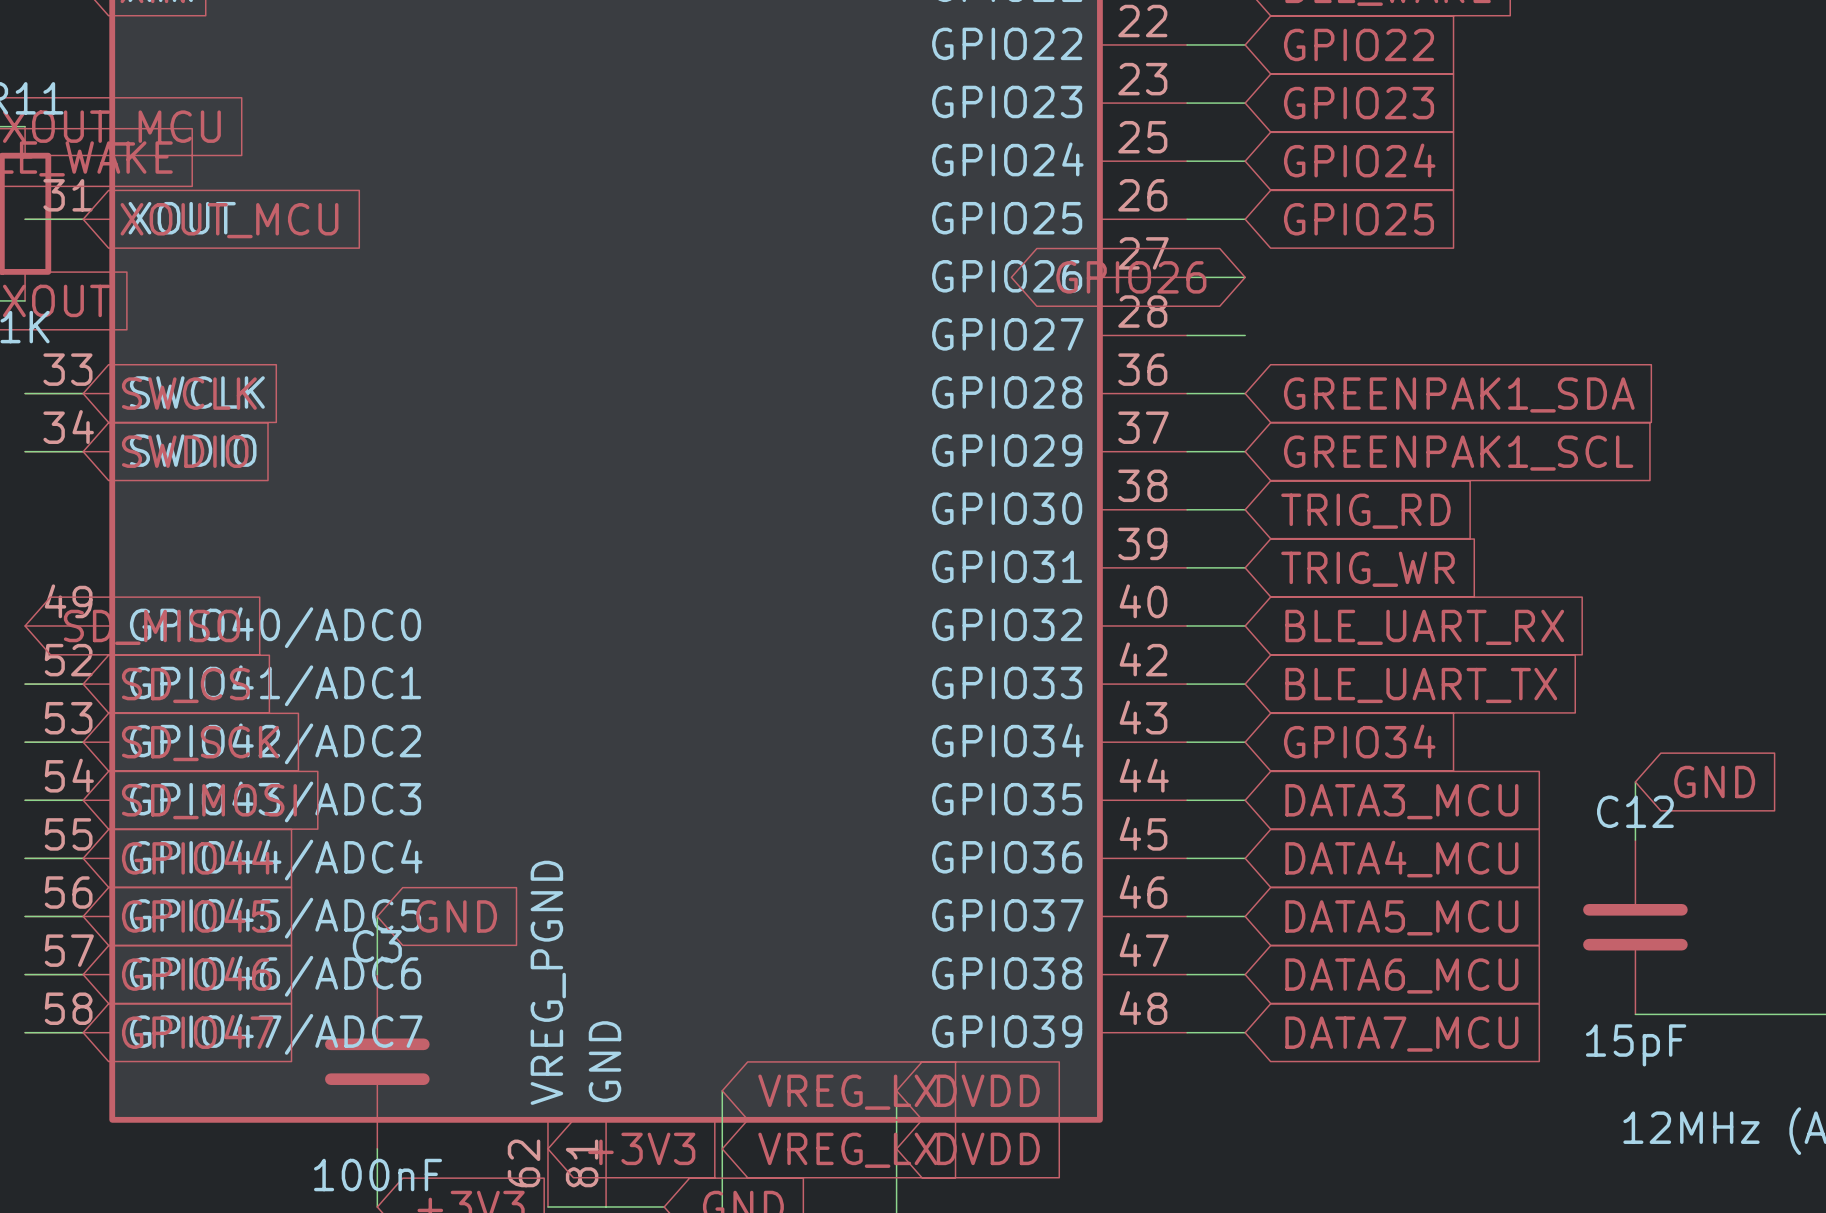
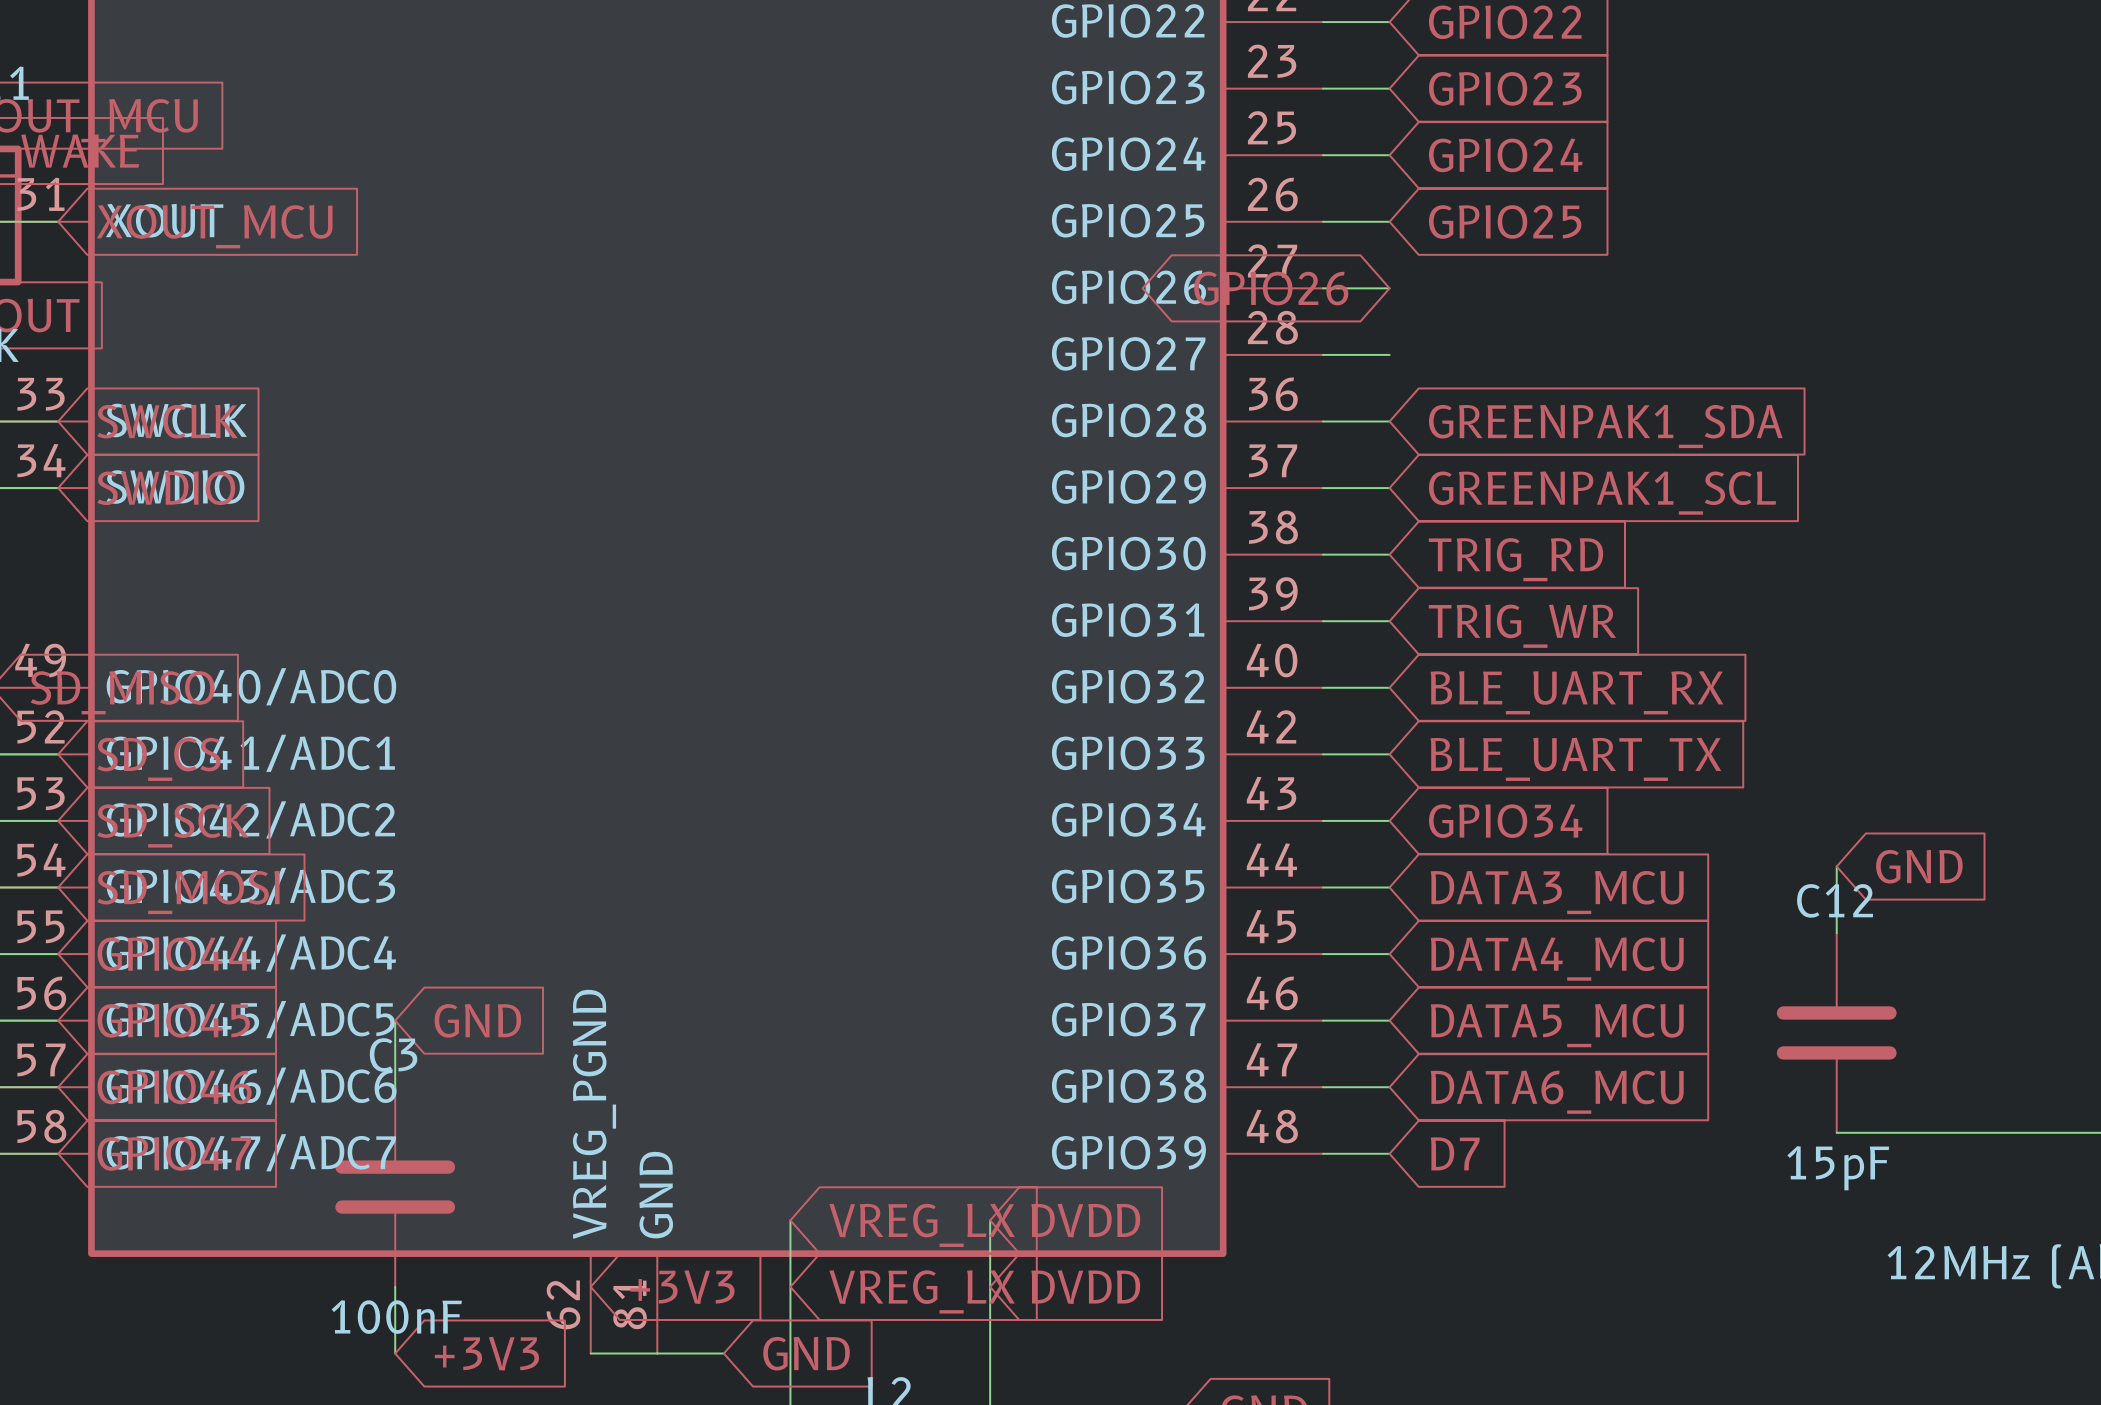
global label: DATA7_MCU (1401, 1034) -> D7 (1455, 1153)

